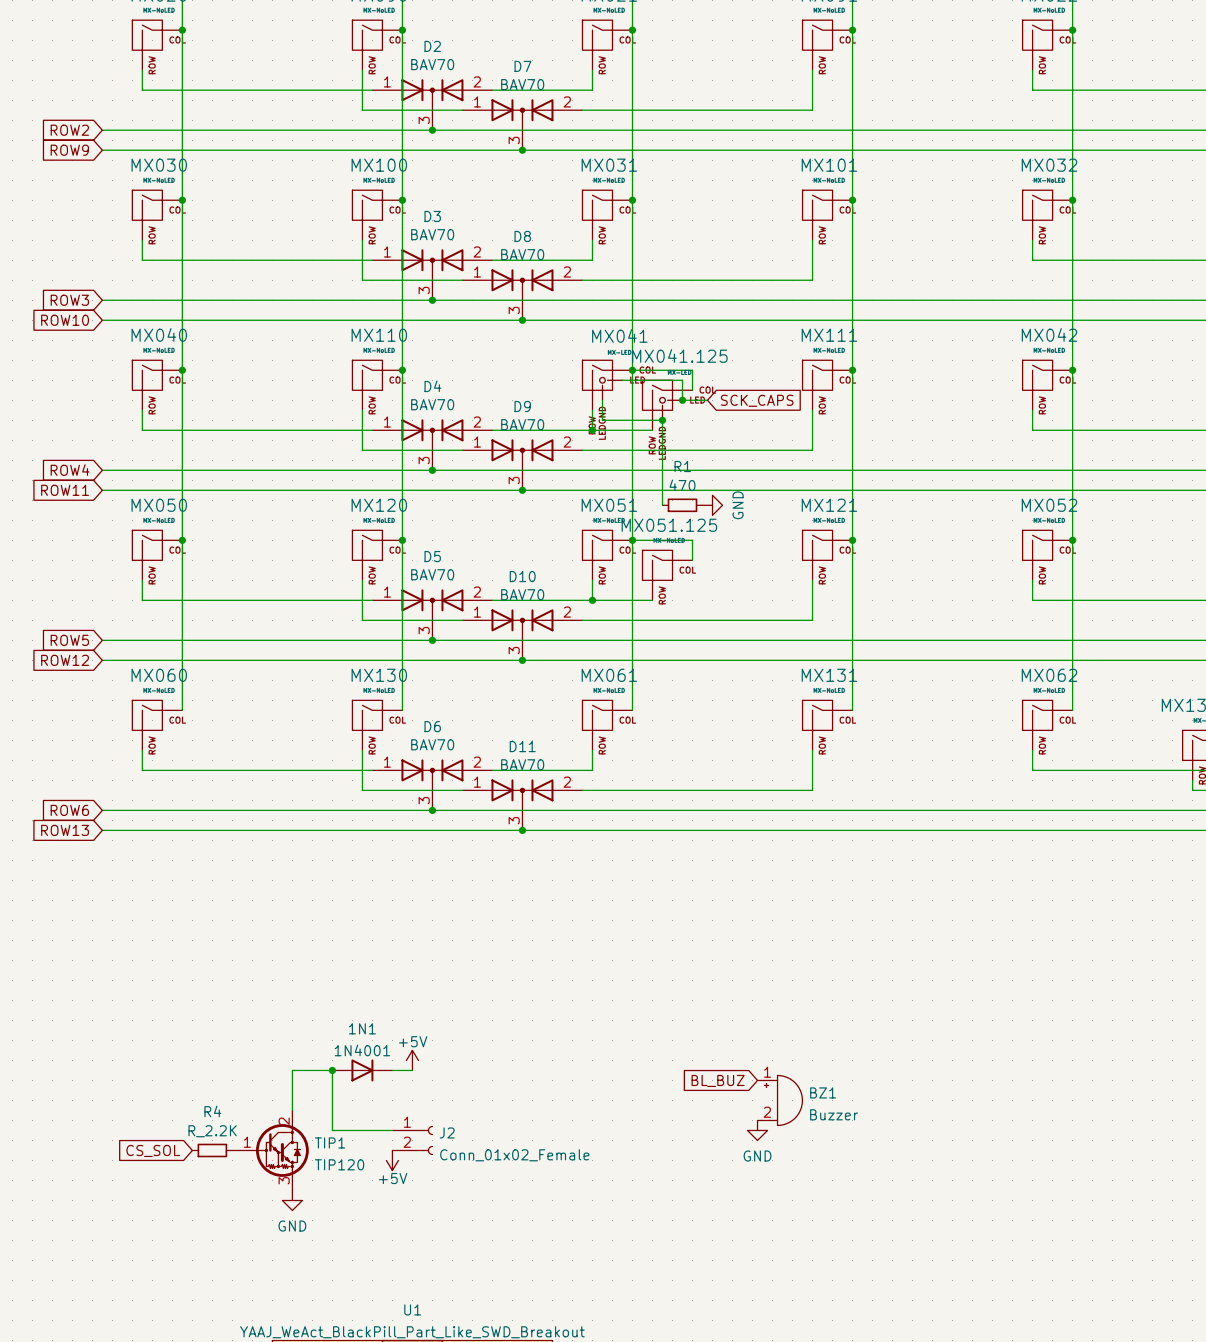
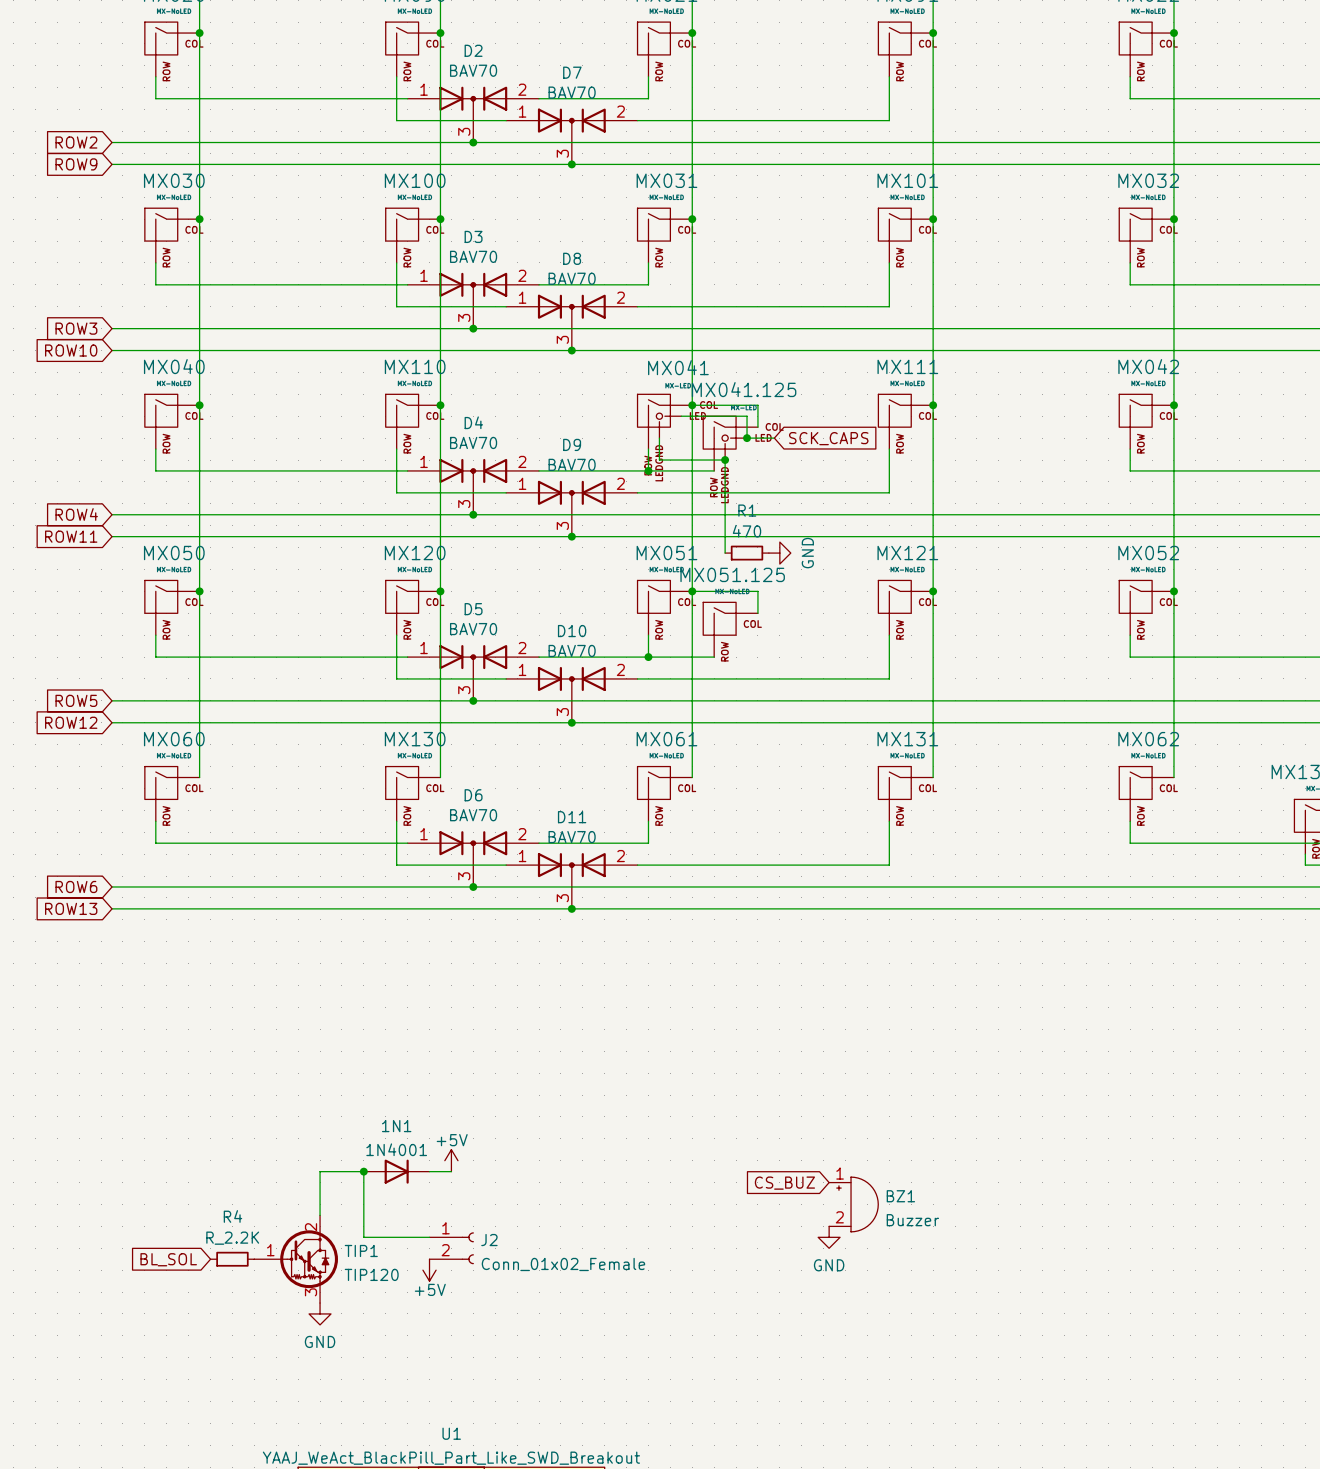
global label: BL_BUZ (718, 1080) -> CS_BUZ (784, 1183)
global label: CS_SOL (153, 1150) -> BL_SOL (168, 1259)

